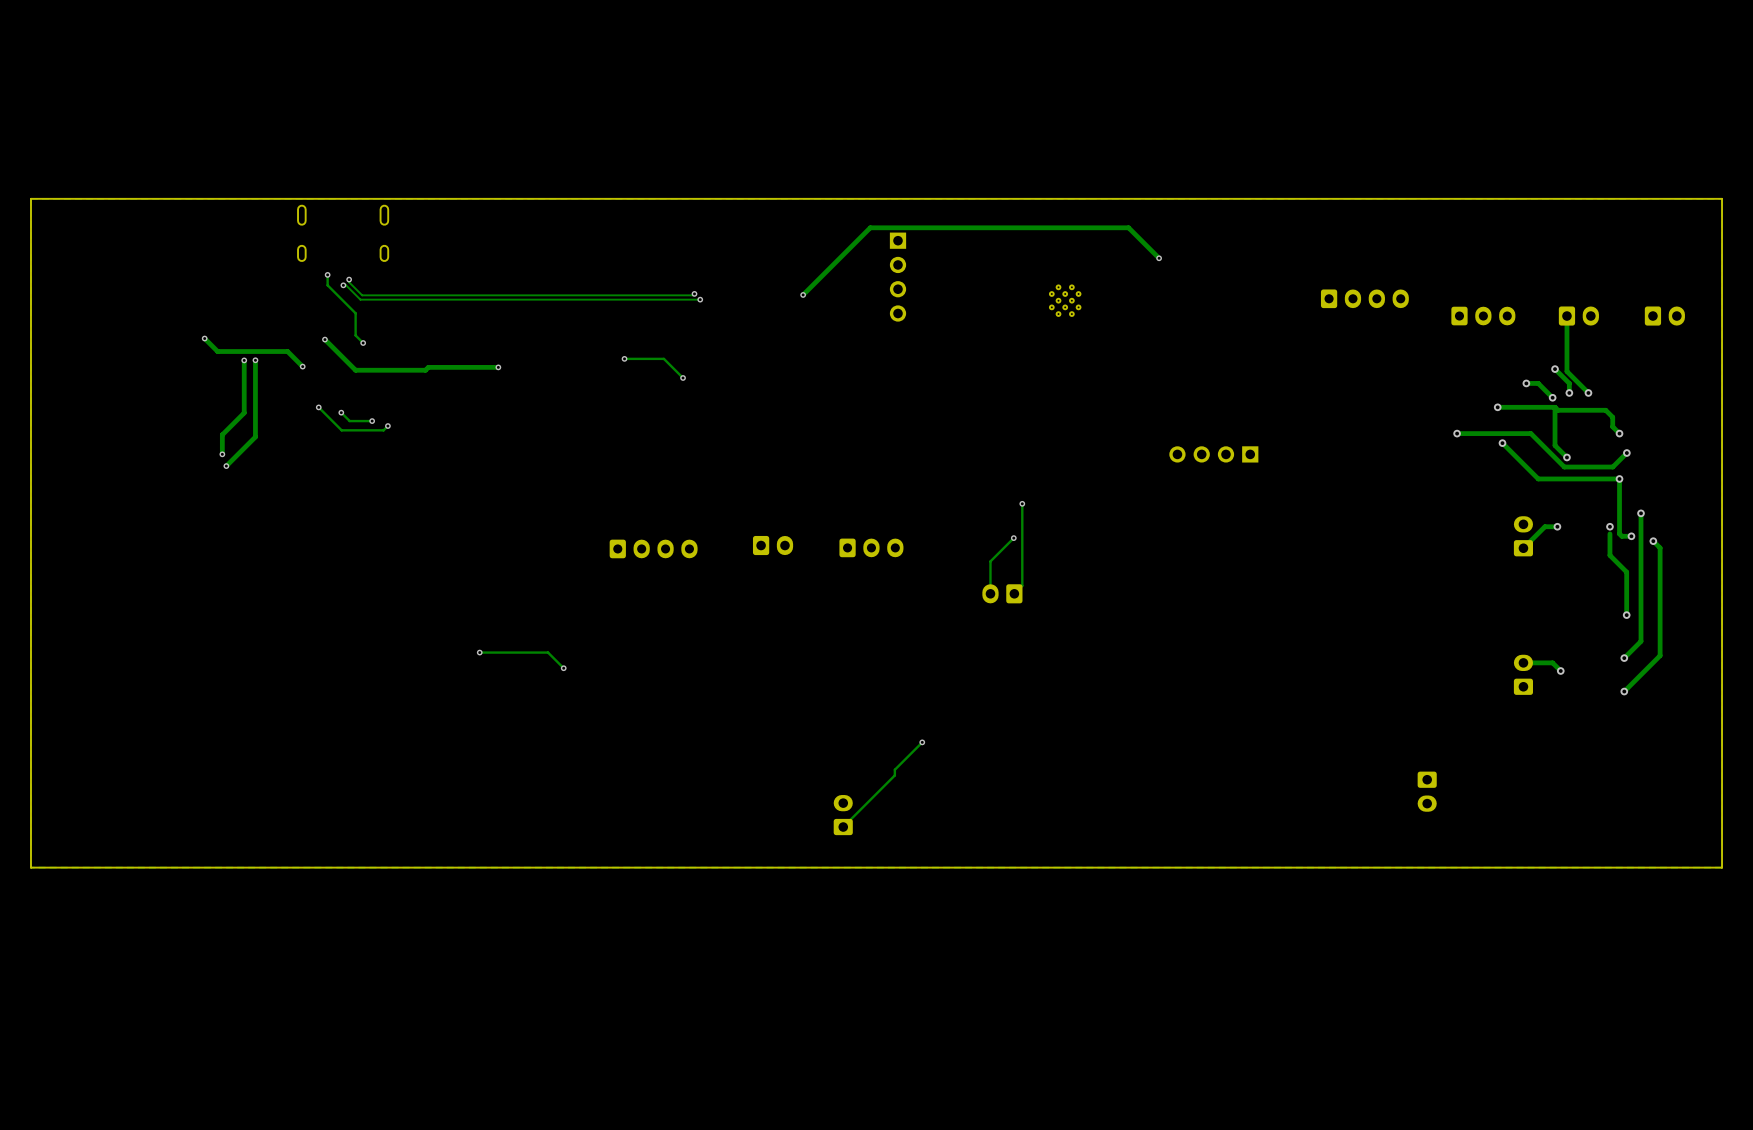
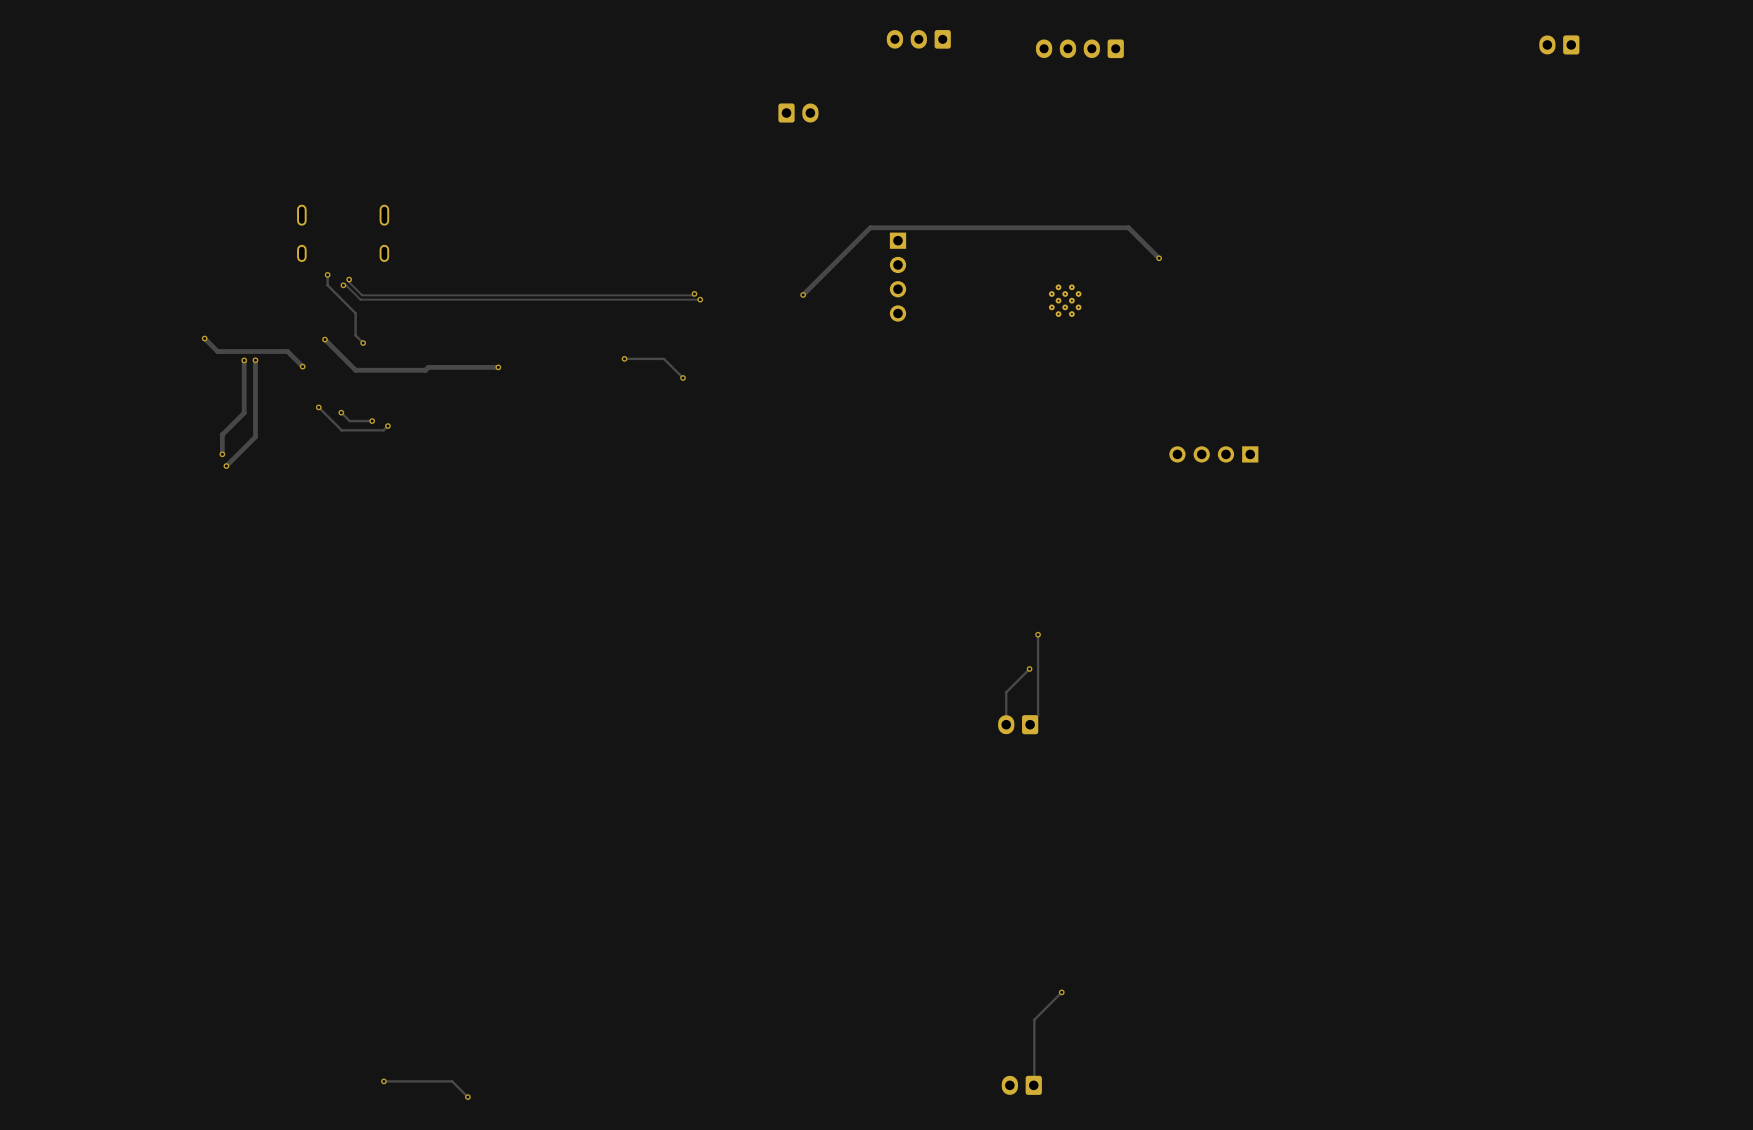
part: none -> (918, 39)
part: none -> (1559, 44)
part: none -> (1079, 48)
part: none -> (798, 113)
board edge: (1722, 198) (1722, 867) (30, 867) (30, 198) (1722, 198) -> none
part: (1364, 298) -> none
part: (1483, 316) -> none
track: (1566, 316) (1566, 371) (1588, 392) -> none
part: (1578, 316) -> none
part: (1664, 316) -> none
track: (1555, 369) (1569, 383) (1569, 392) -> none
via: (1555, 369) -> none
track: (1526, 383) (1538, 383) (1552, 397) -> none
via: (1526, 383) -> none
via: (1569, 392) -> none
via: (1588, 392) -> none
via: (1552, 397) -> none
via: (1497, 407) -> none
track: (1555, 407) (1557, 410) (1605, 410) (1612, 417) (1612, 426) (1619, 433) -> none
track: (1555, 407) (1497, 407) -> none
track: (1555, 407) (1555, 445) (1566, 457) -> none
track: (1457, 433) (1530, 433) (1564, 467) (1612, 467) (1626, 453) -> none
via: (1457, 433) -> none
via: (1619, 433) -> none
track: (1502, 443) (1538, 478) (1619, 478) (1619, 533) (1621, 536) (1631, 536) -> none
via: (1502, 443) -> none
via: (1626, 453) -> none
via: (1566, 457) -> none
via: (1619, 478) -> none
track: (1022, 503) (1022, 585) (1014, 593) -> none
via: (1022, 503) -> none
track: (1641, 513) (1641, 641) (1624, 658) -> none
via: (1641, 513) -> none
track: (1557, 526) (1544, 526) (1523, 548) -> none
via: (1557, 526) -> none
via: (1609, 526) -> none
track: (1609, 533) (1609, 555) (1626, 572) (1626, 615) -> none
part: (1523, 536) -> none
via: (1631, 536) -> none
track: (1013, 538) (990, 561) (990, 593) -> (1029, 668) (1006, 692) (1006, 724)
via: (1013, 538) -> none
track: (1653, 541) (1660, 547) (1660, 655) (1624, 691) -> none
via: (1653, 541) -> none
part: (773, 545) -> none
part: (871, 547) -> none
part: (653, 548) -> none
part: (1002, 593) -> none
via: (1626, 615) -> none
track: none -> (1038, 634) (1038, 715) (1030, 724)
via: none -> (1038, 634)
track: (479, 652) (548, 652) (563, 668) -> none
via: (479, 652) -> none
via: (1624, 658) -> none
track: (1523, 662) (1552, 662) (1560, 671) -> none
via: (563, 668) -> none
via: none -> (1029, 668)
via: (1560, 671) -> none
part: (1523, 674) -> none
via: (1624, 691) -> none
part: none -> (1018, 724)
track: (922, 742) (894, 769) (894, 775) (843, 827) -> none
via: (922, 742) -> none
part: (1427, 791) -> none
part: (843, 815) -> none
track: none -> (1061, 992) (1034, 1019) (1033, 1085)
via: none -> (1061, 992)
track: none -> (383, 1081) (452, 1081) (467, 1097)
via: none -> (383, 1081)
part: none -> (1021, 1085)
via: none -> (467, 1097)

